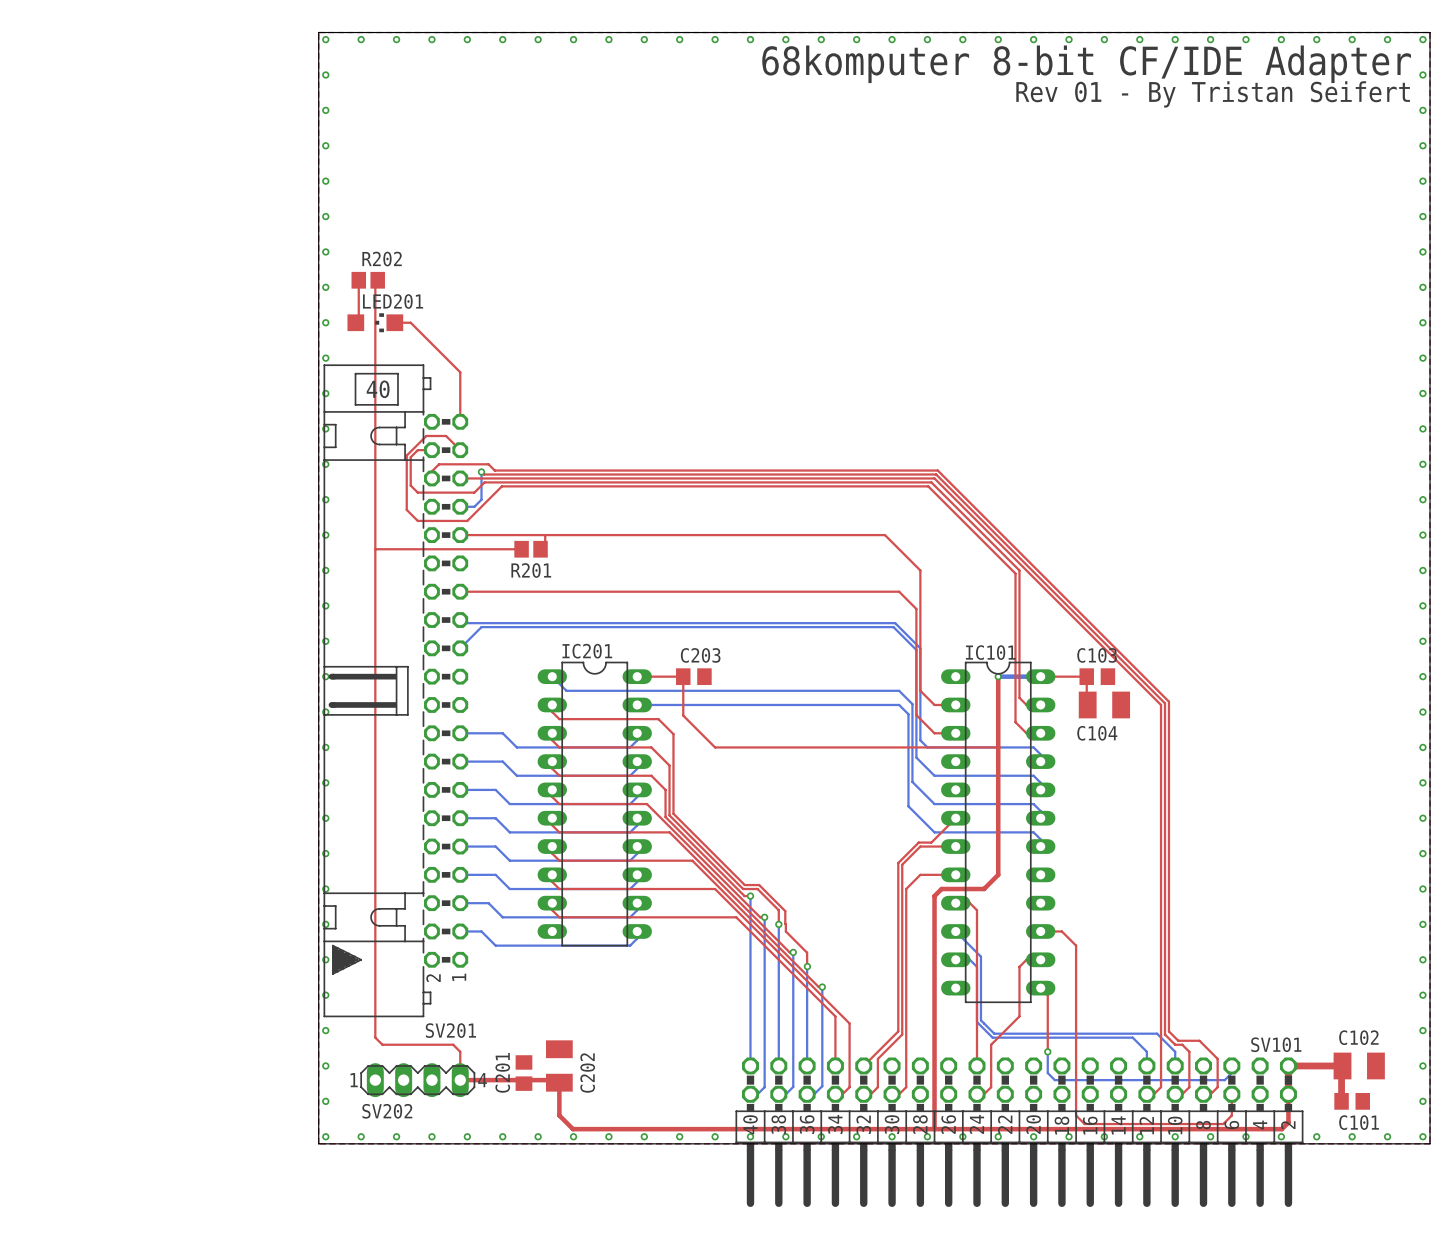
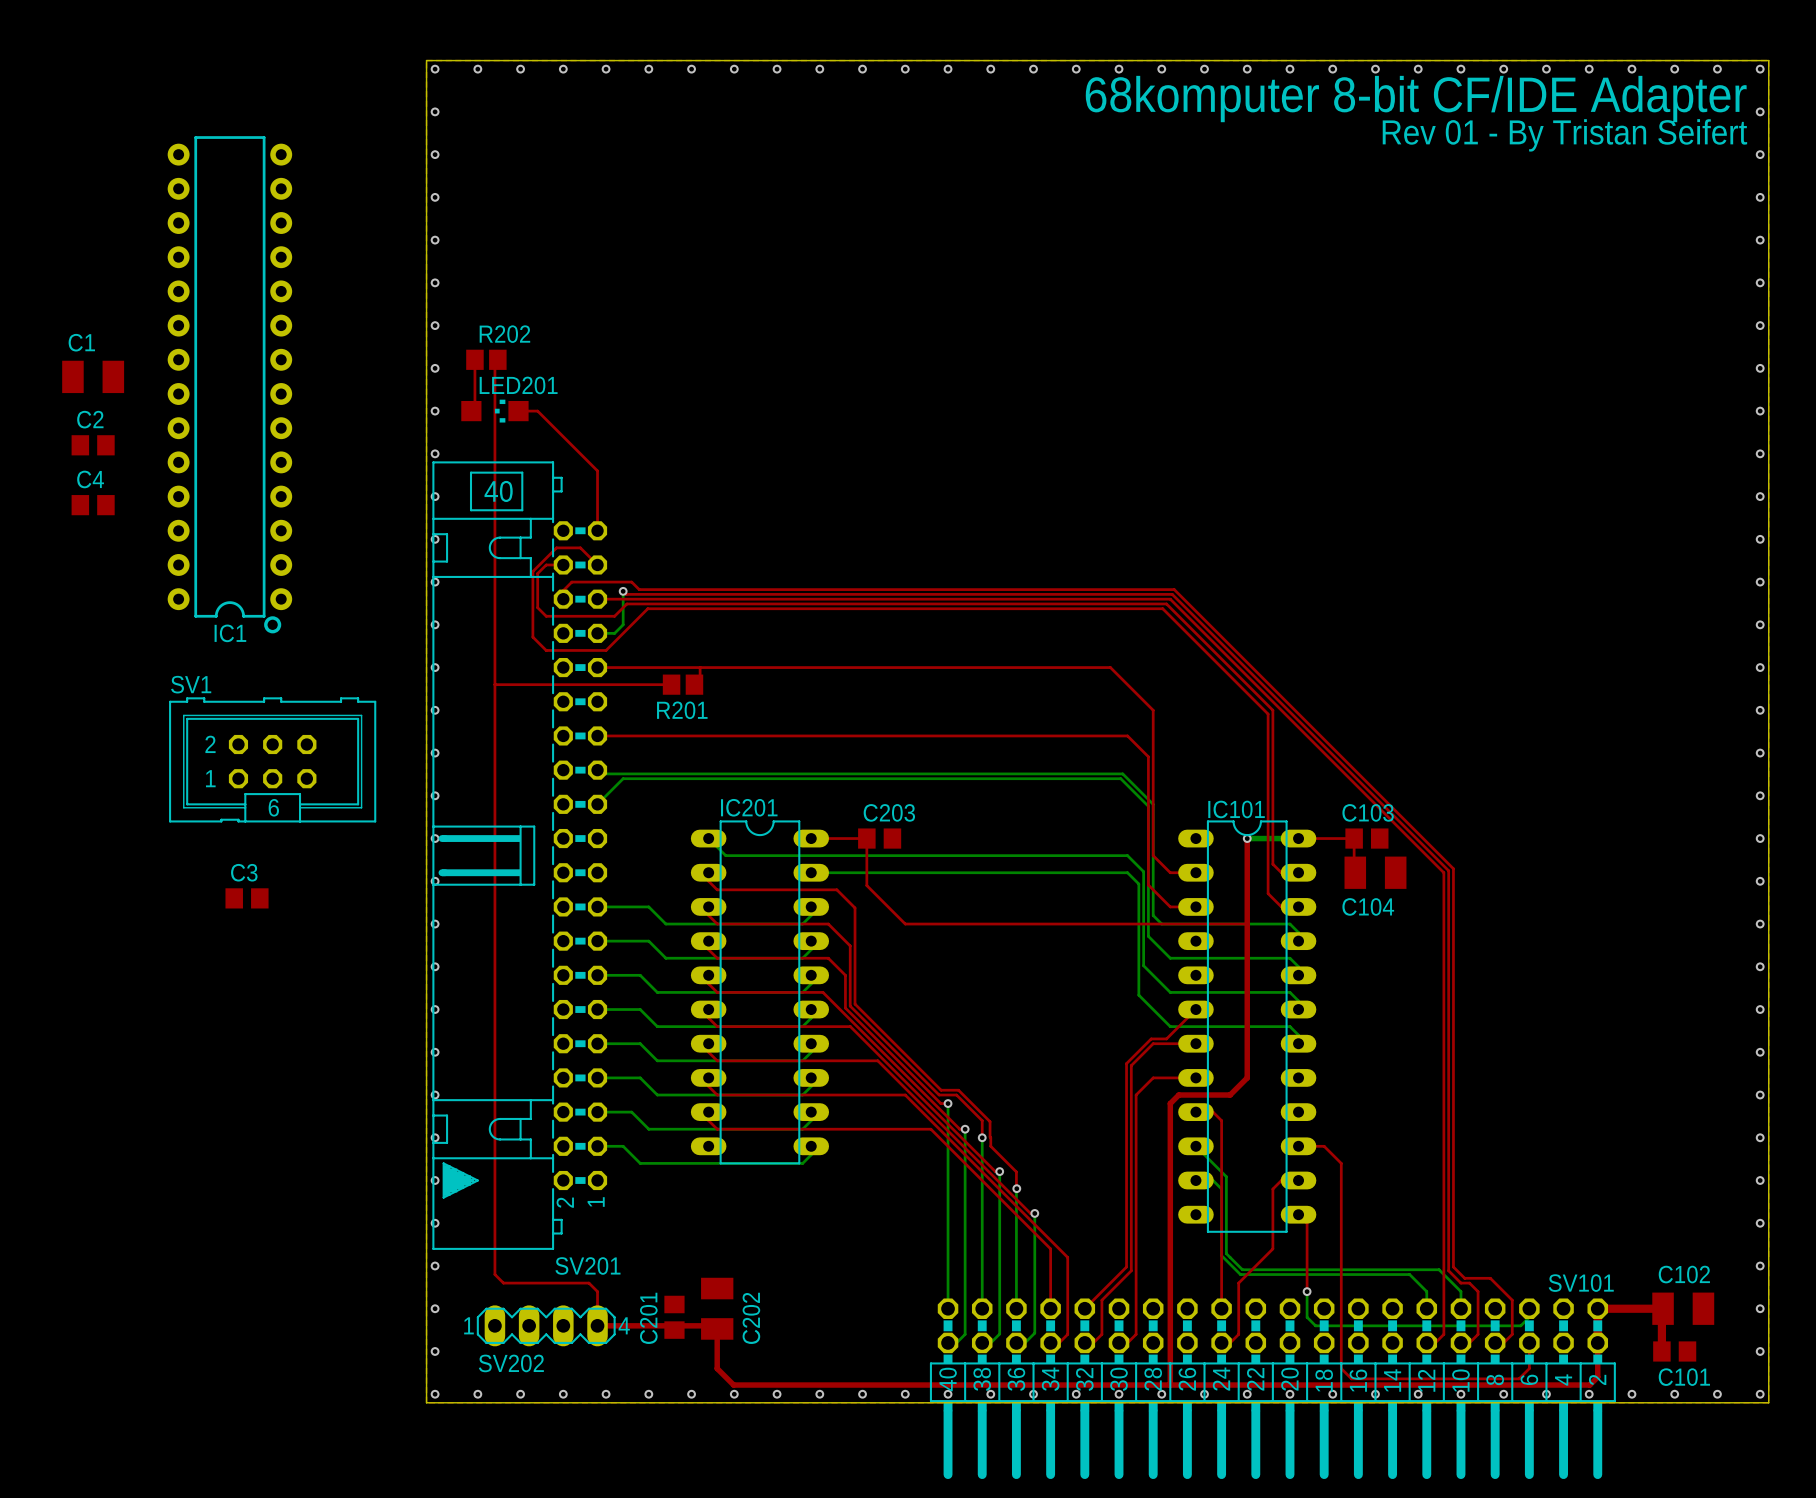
C1: none -> (93, 376)
IC1: none -> (229, 384)
C2: none -> (93, 445)
C4: none -> (93, 505)
SV1: none -> (272, 759)
C3: none -> (247, 898)

